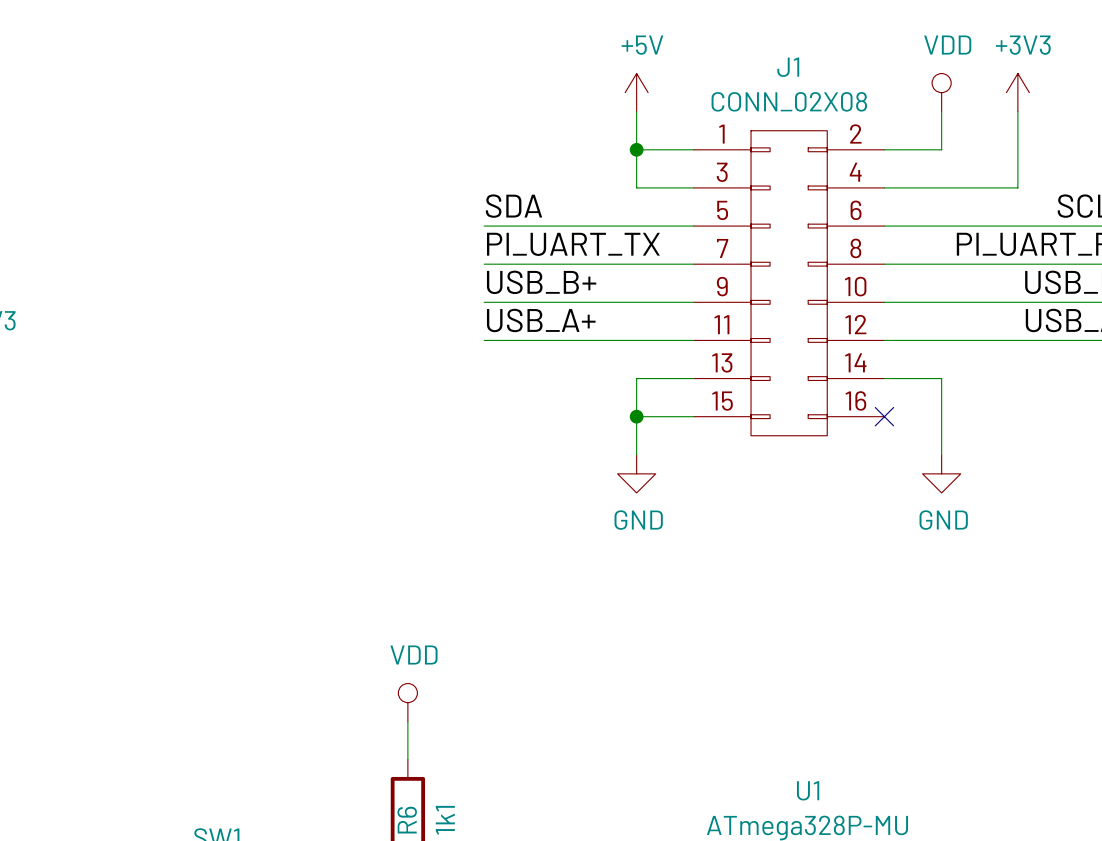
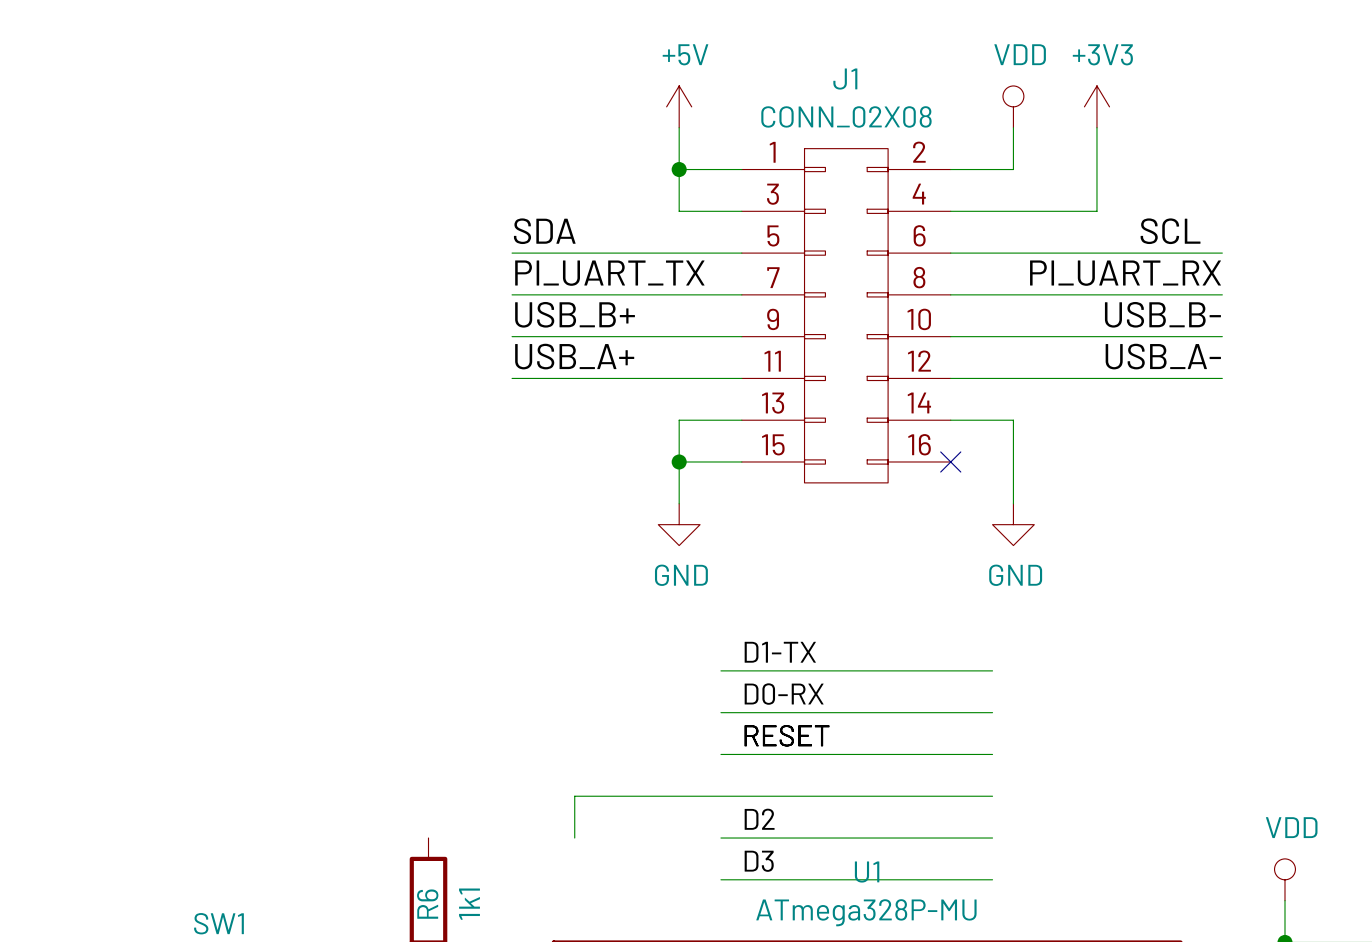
label: none -> D1-TX (780, 652)
wire: none -> (720, 670) (992, 670)
label: none -> D0-RX (784, 694)
wire: none -> (720, 712) (992, 712)
label: none -> RESET (787, 735)
wire: none -> (720, 754) (992, 754)
power symbol: VDD (407, 702) -> none
wire: (407, 721) (407, 759) -> none
wire: none -> (992, 796) (574, 796) (574, 838)
label: none -> D2 (759, 819)
wire: none -> (720, 838) (992, 838)
label: none -> D3 (759, 861)
wire: none -> (720, 879) (992, 879)

